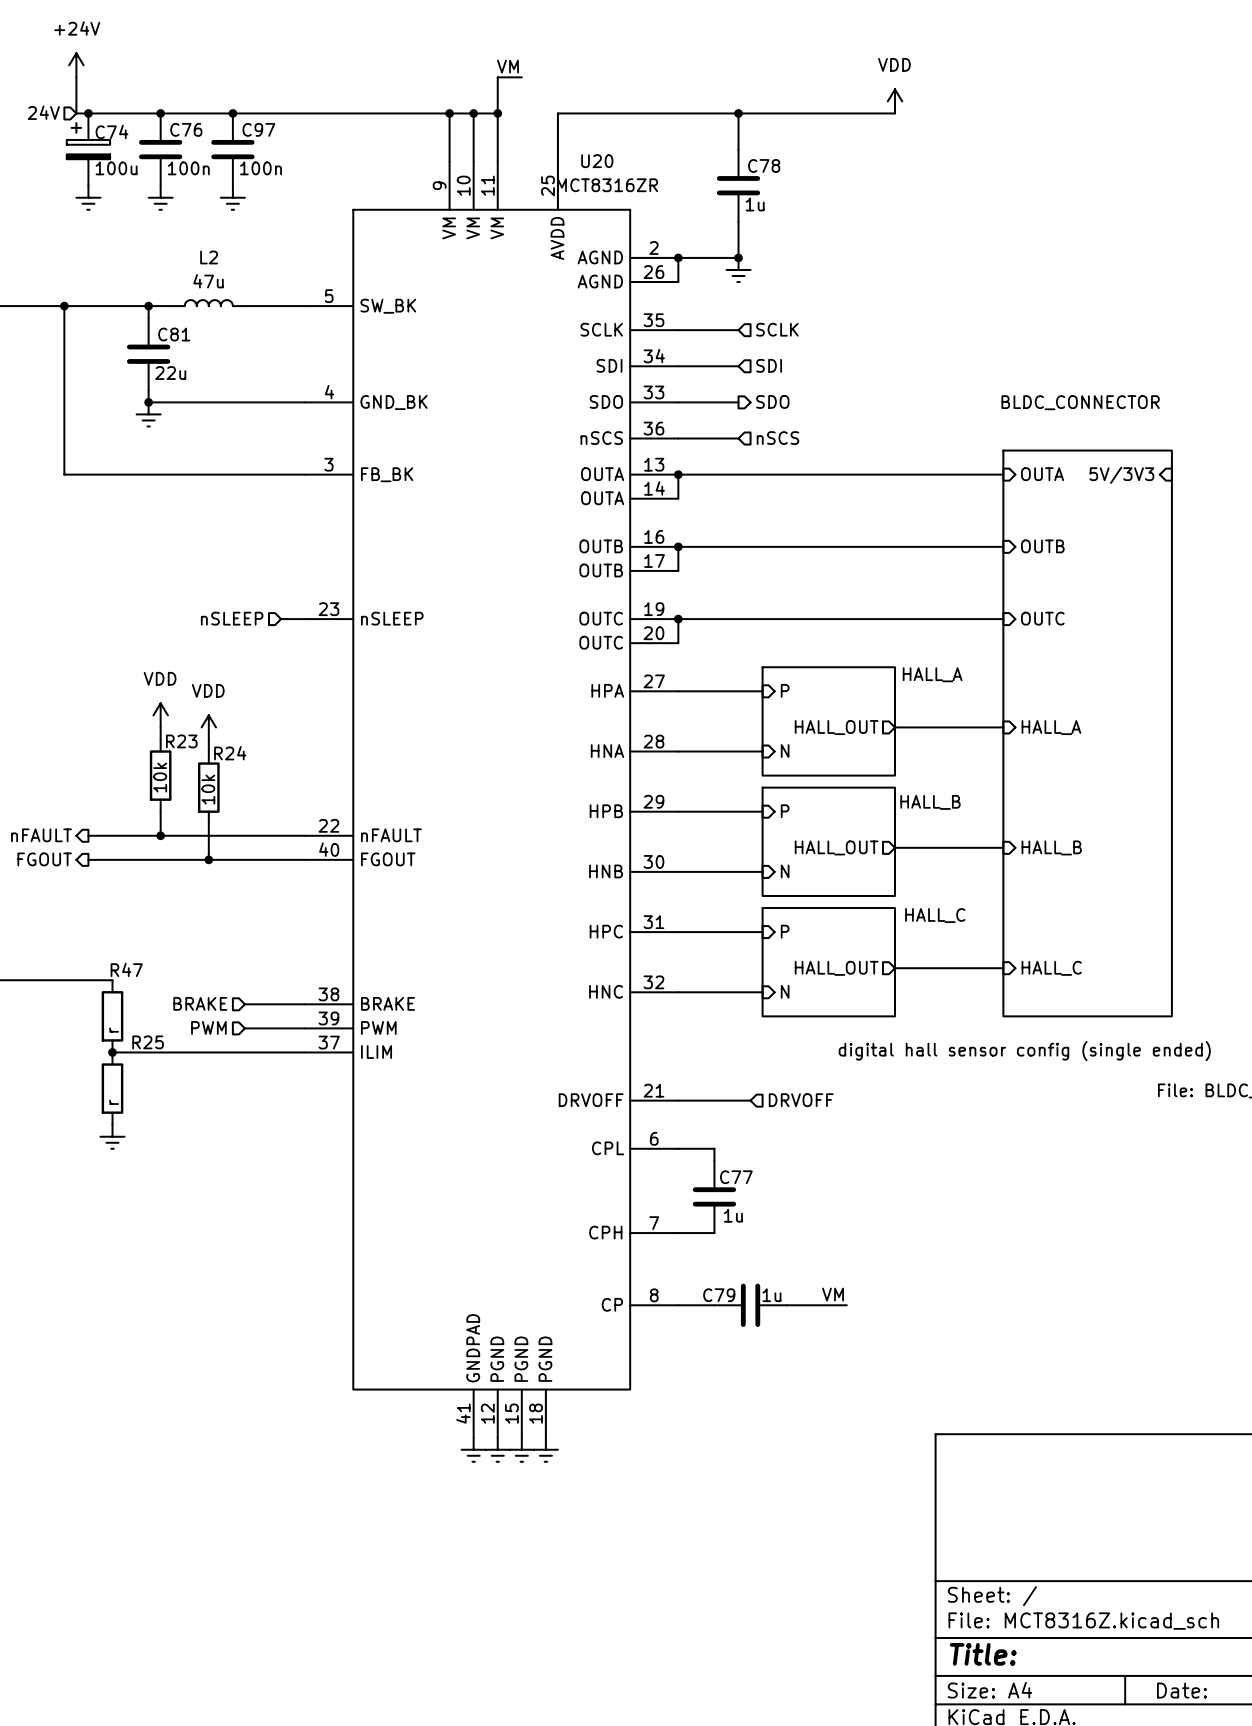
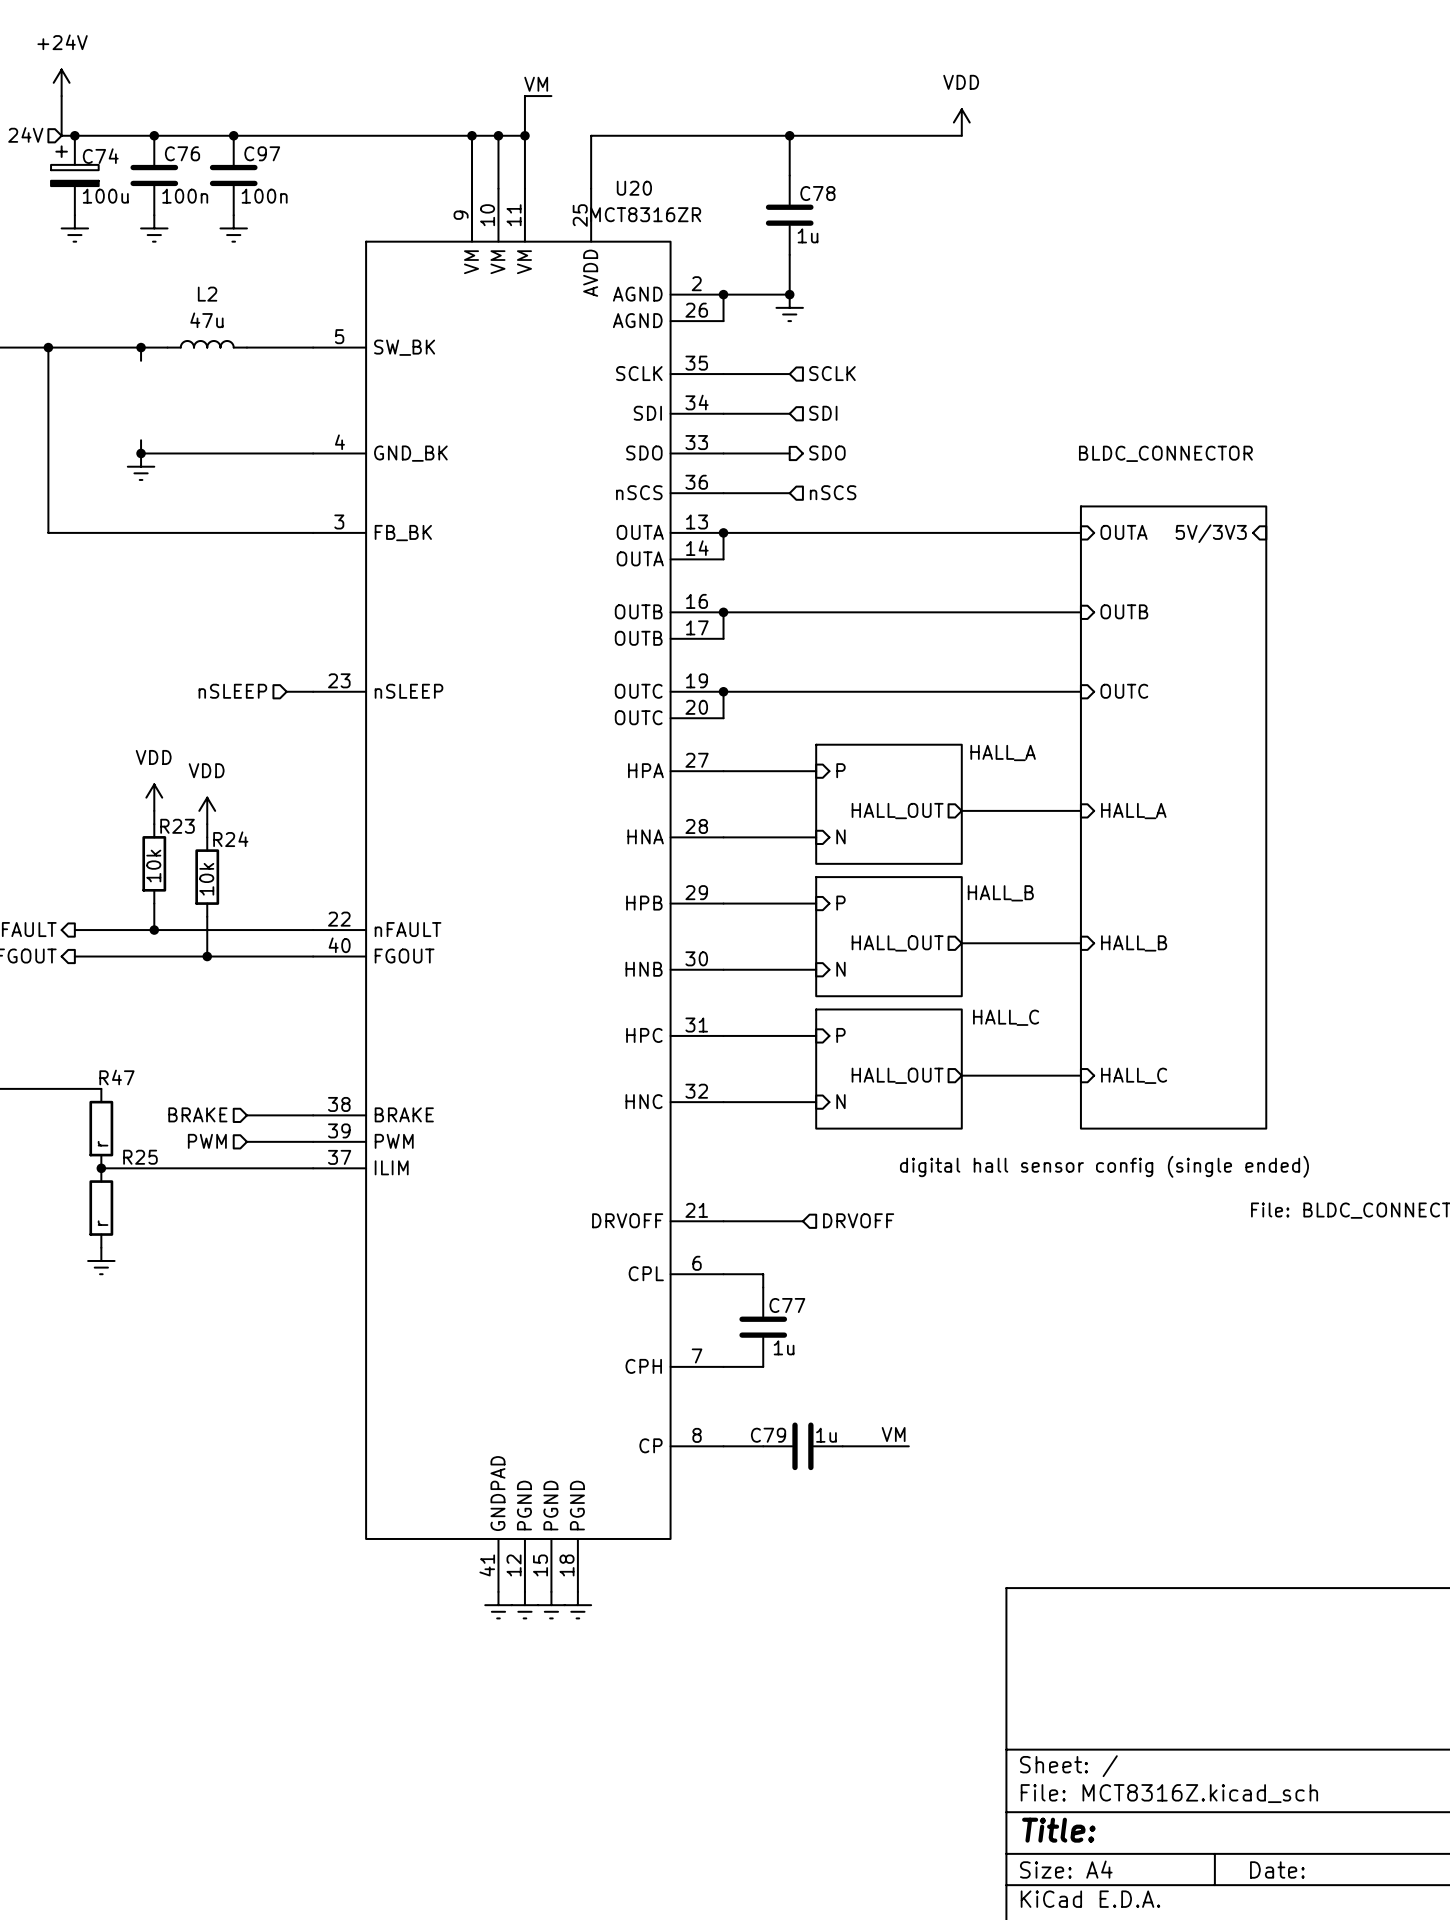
C81: 22u (148, 354) -> none

